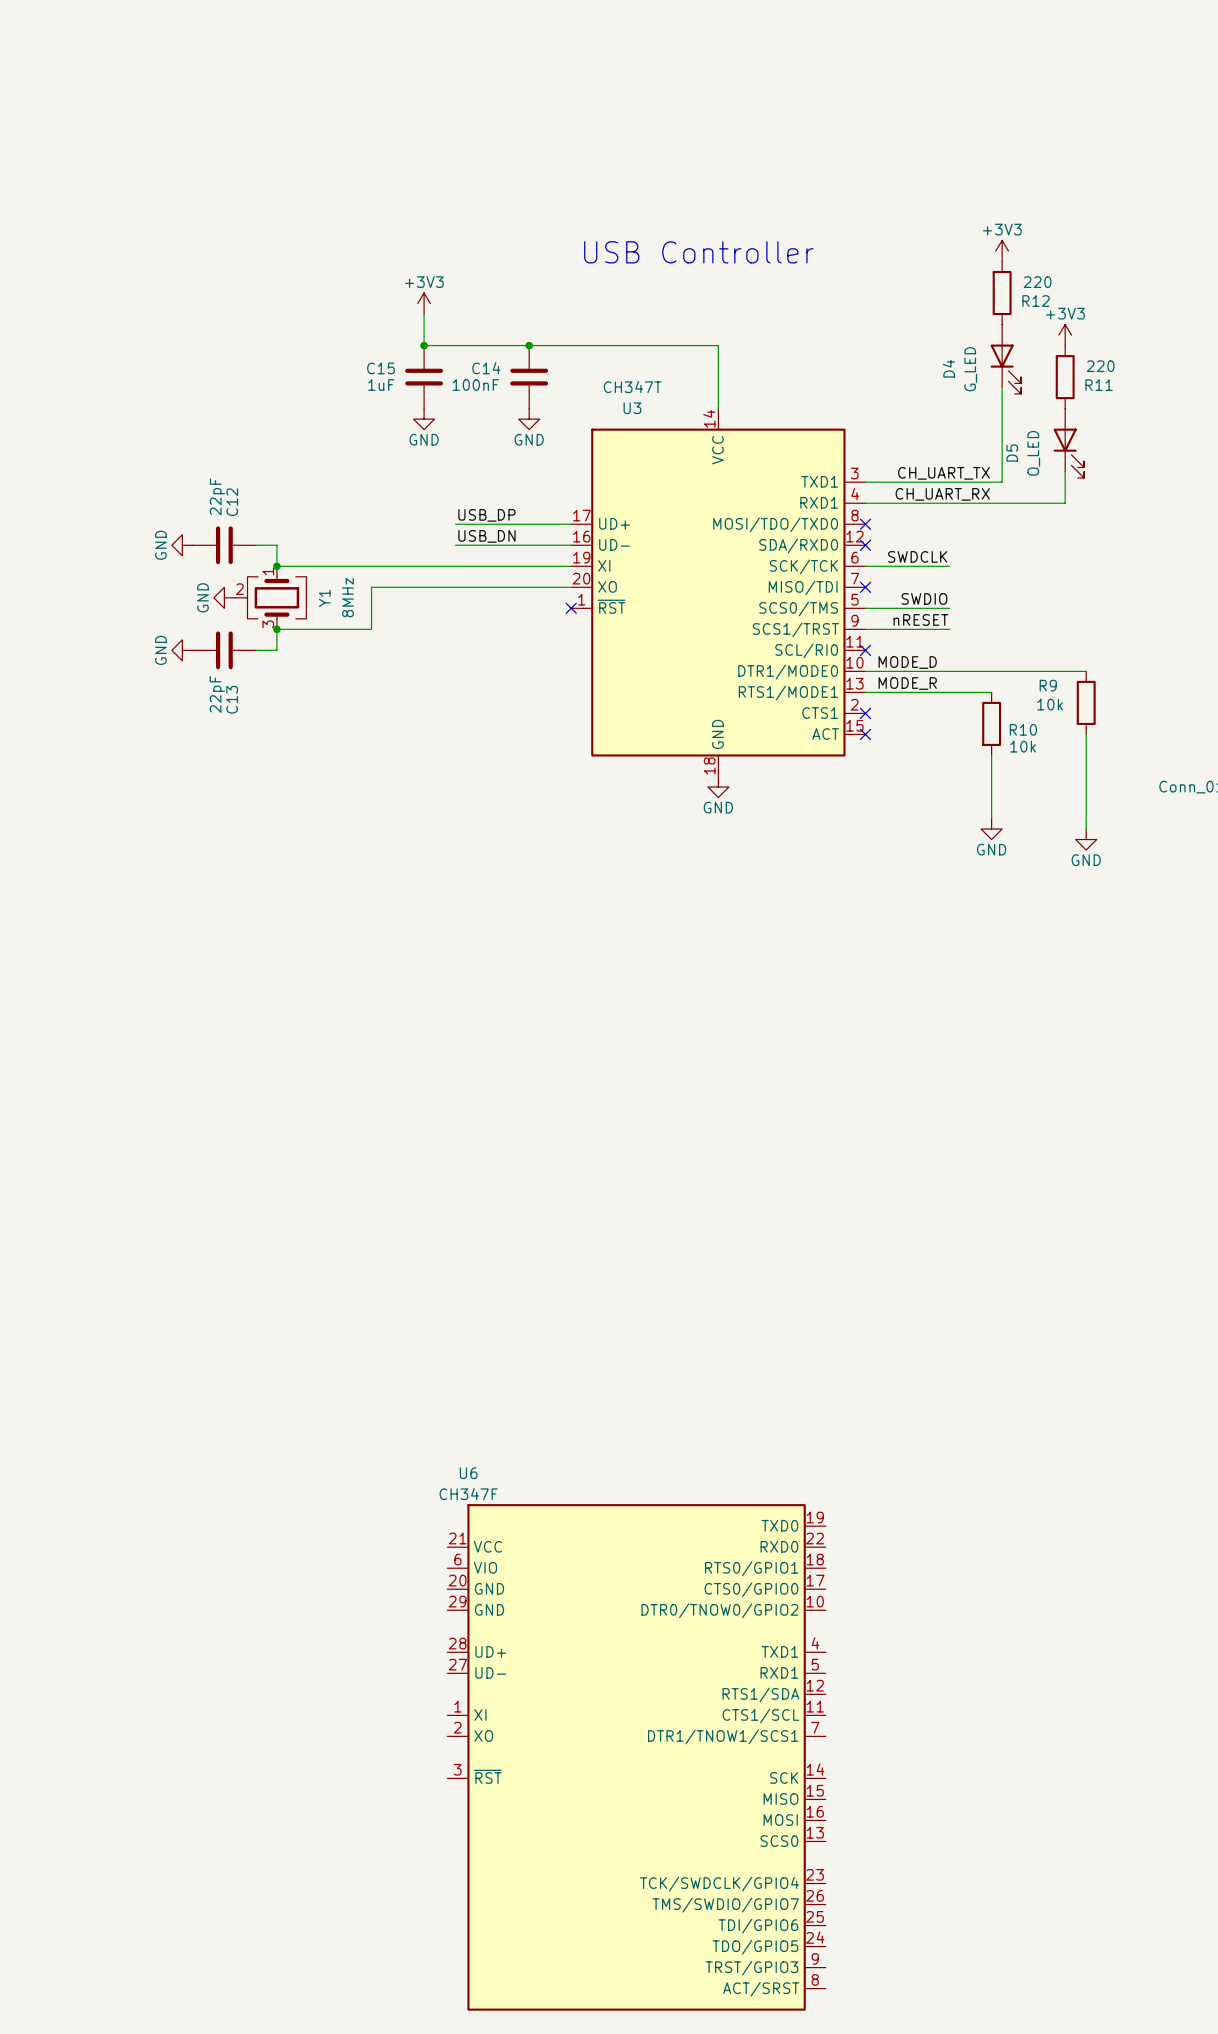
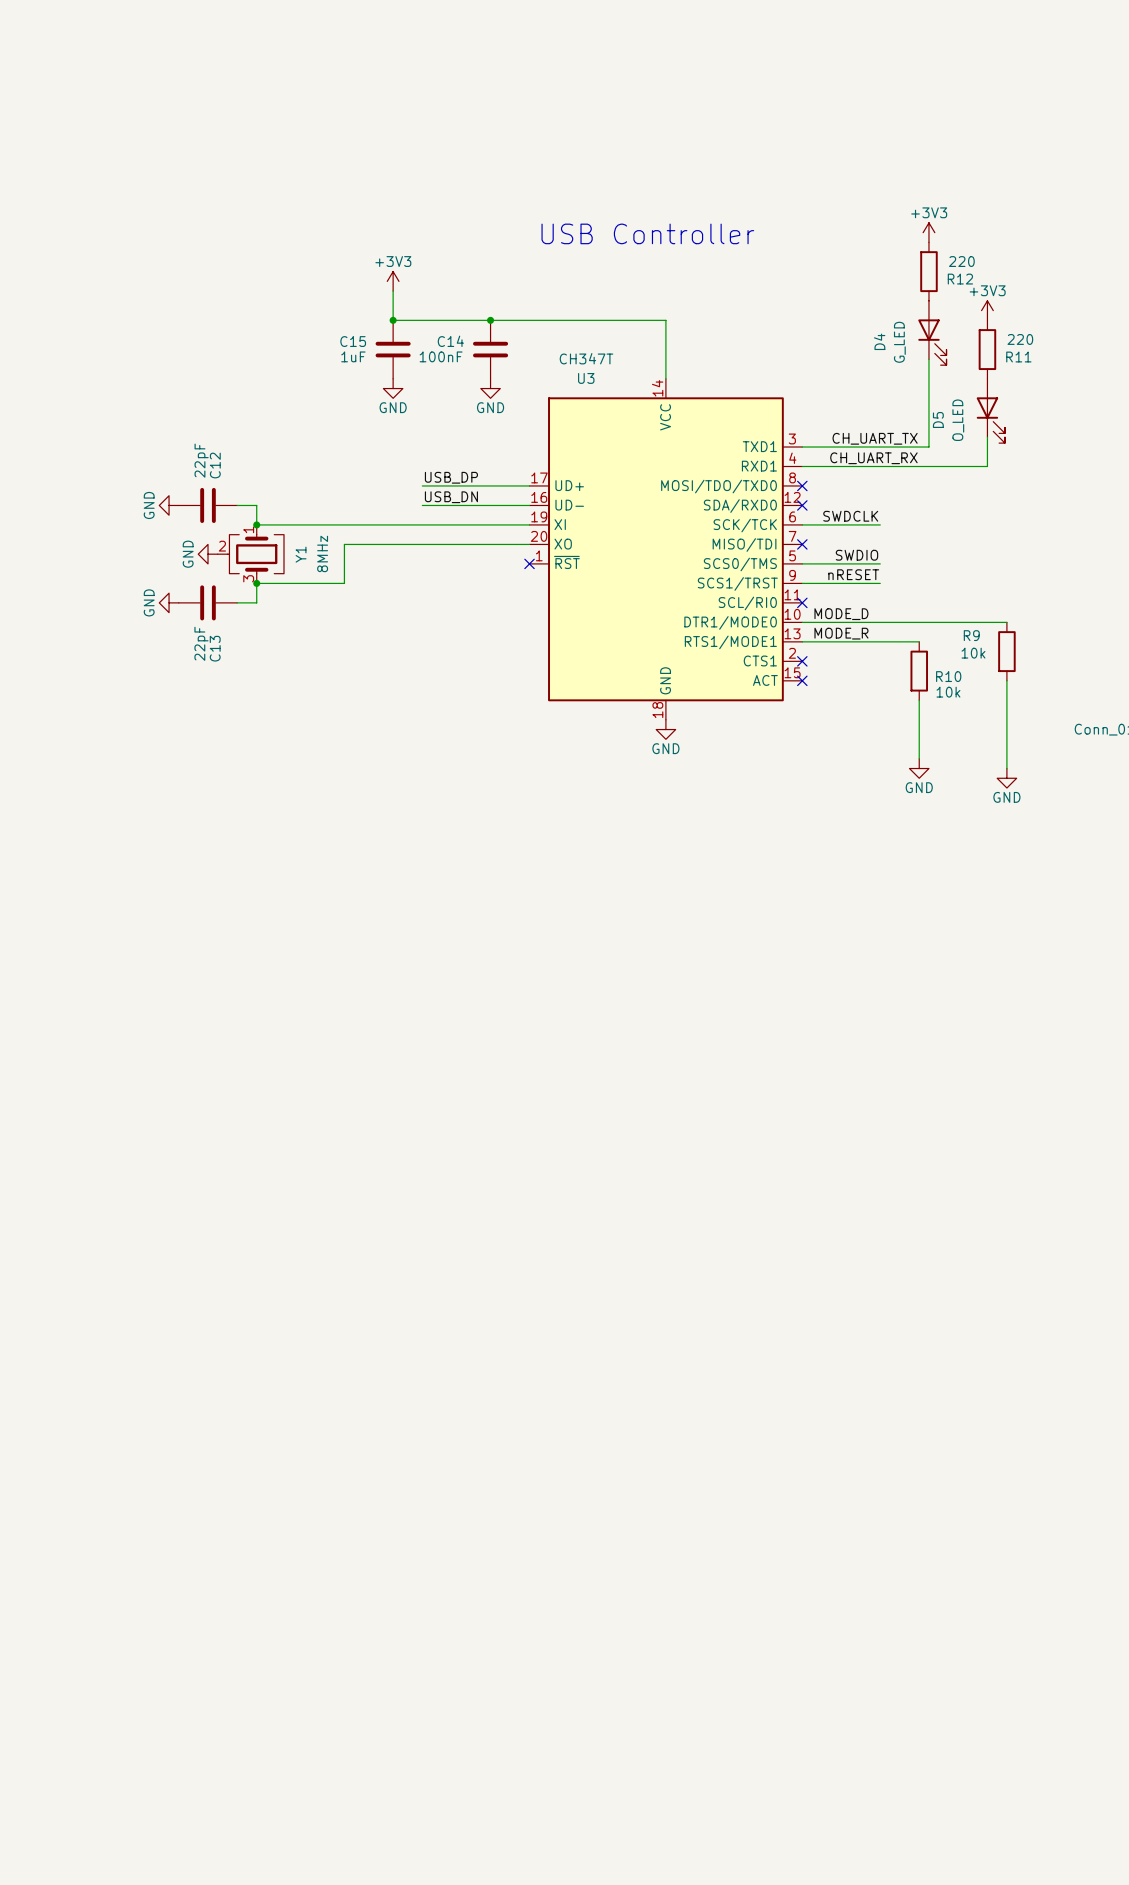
U6: CH347F (636, 1757) -> none

